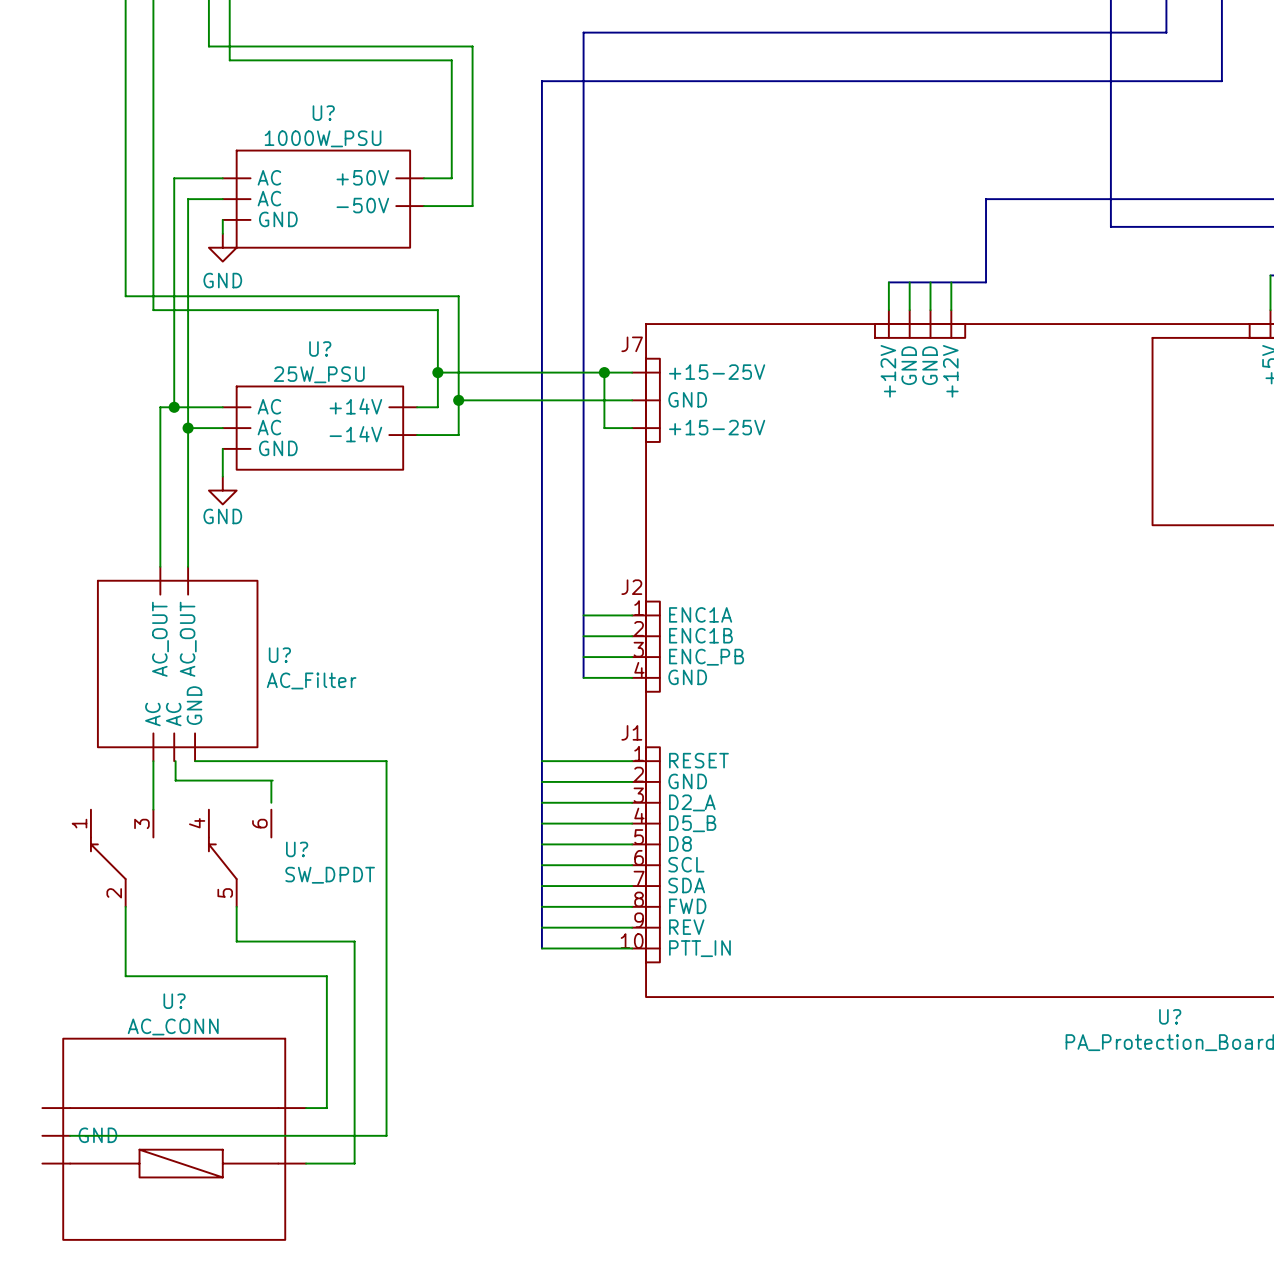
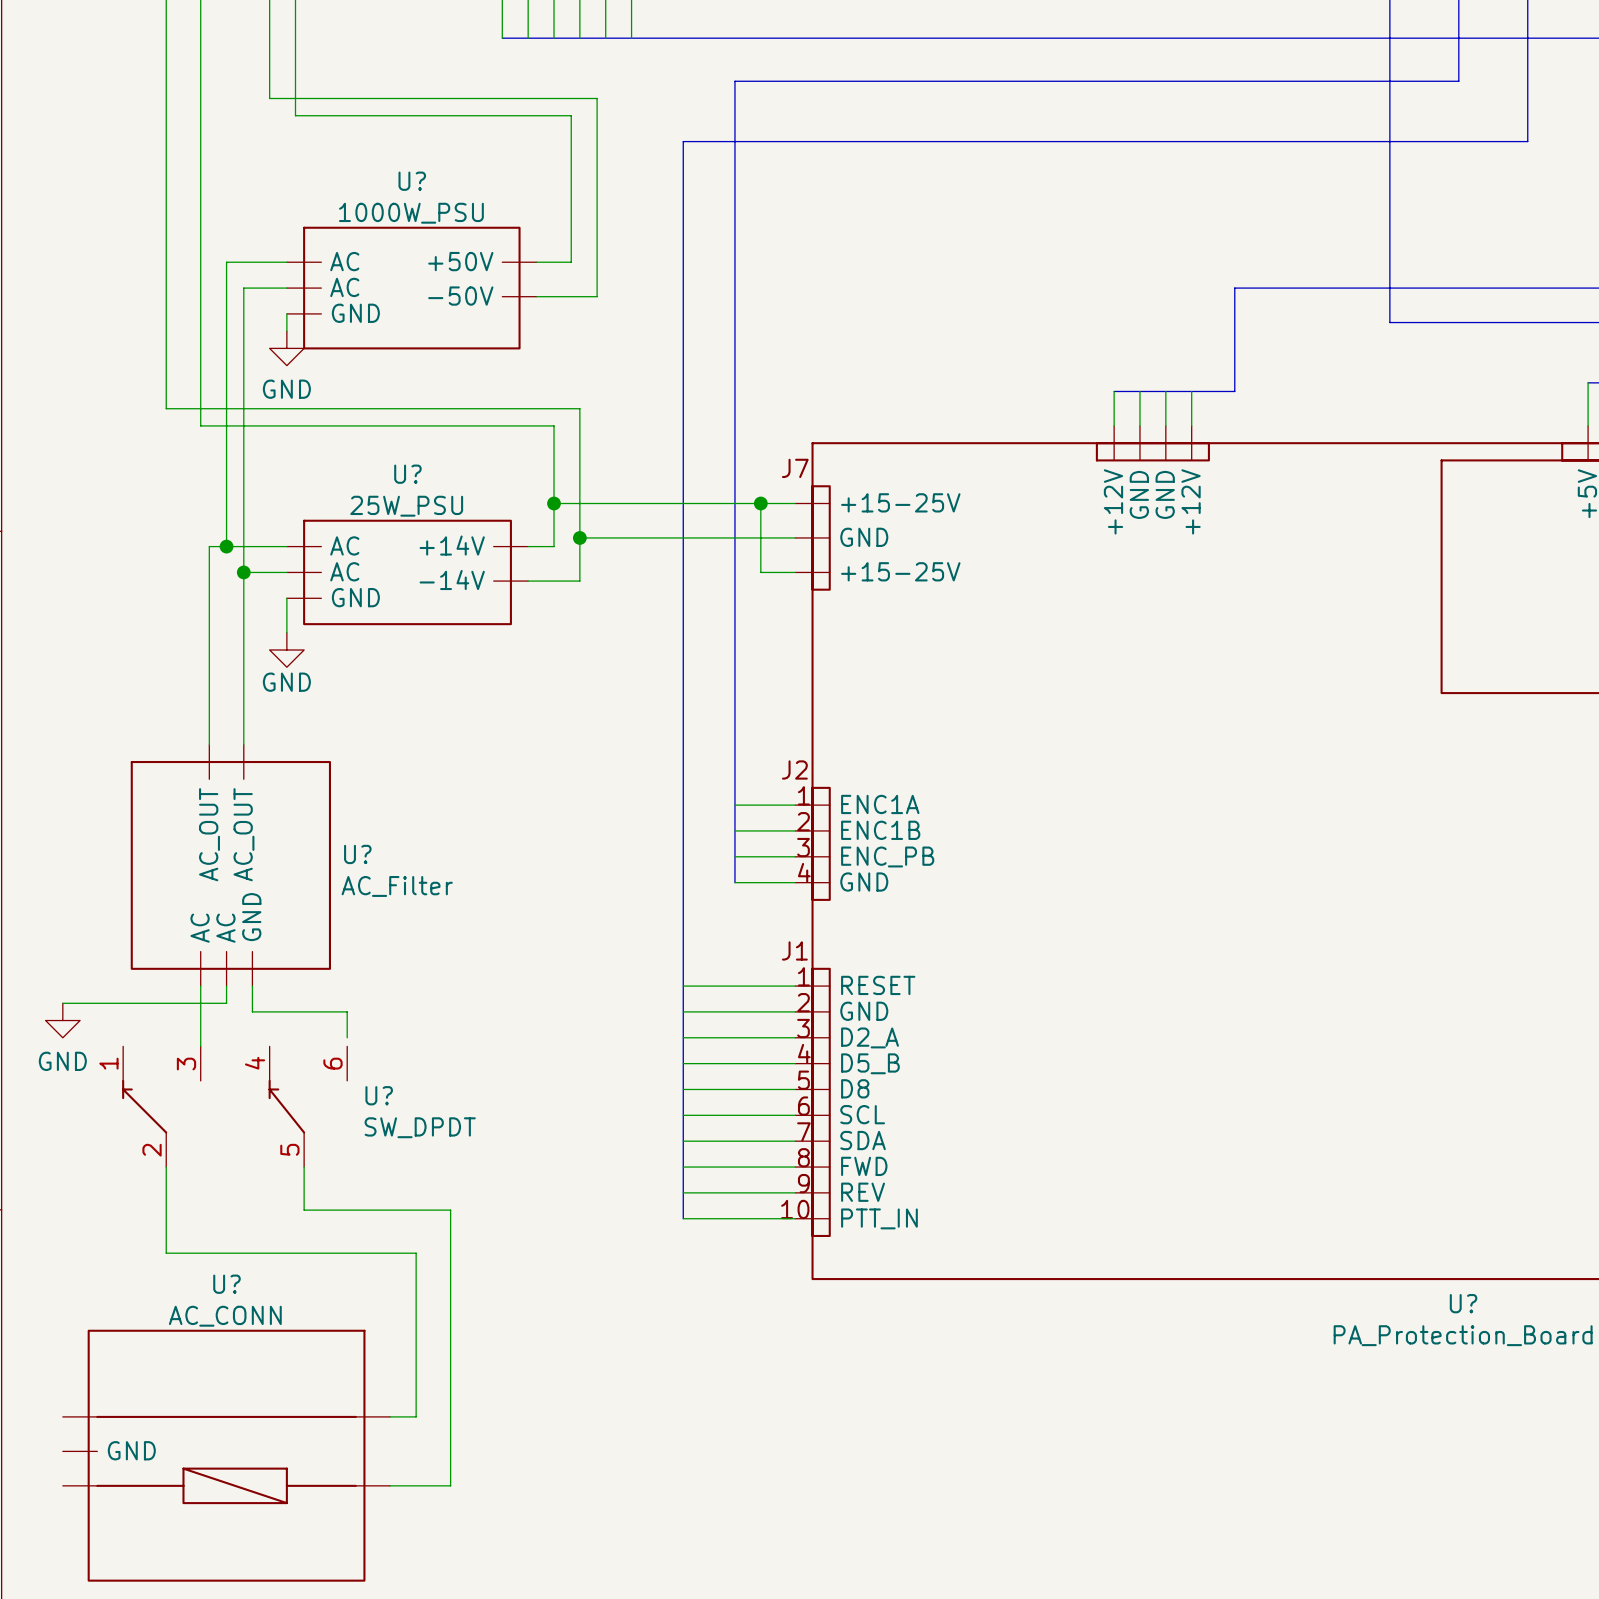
wire: none -> (226, 986) (226, 1003) (62, 1003)
wire: (175, 761) (175, 780) (272, 780) -> none
wire: (195, 761) (386, 761) (386, 1135) (70, 1135) -> (252, 986) (252, 1011) (347, 1011)
power symbol: none -> GND (62, 1020)

